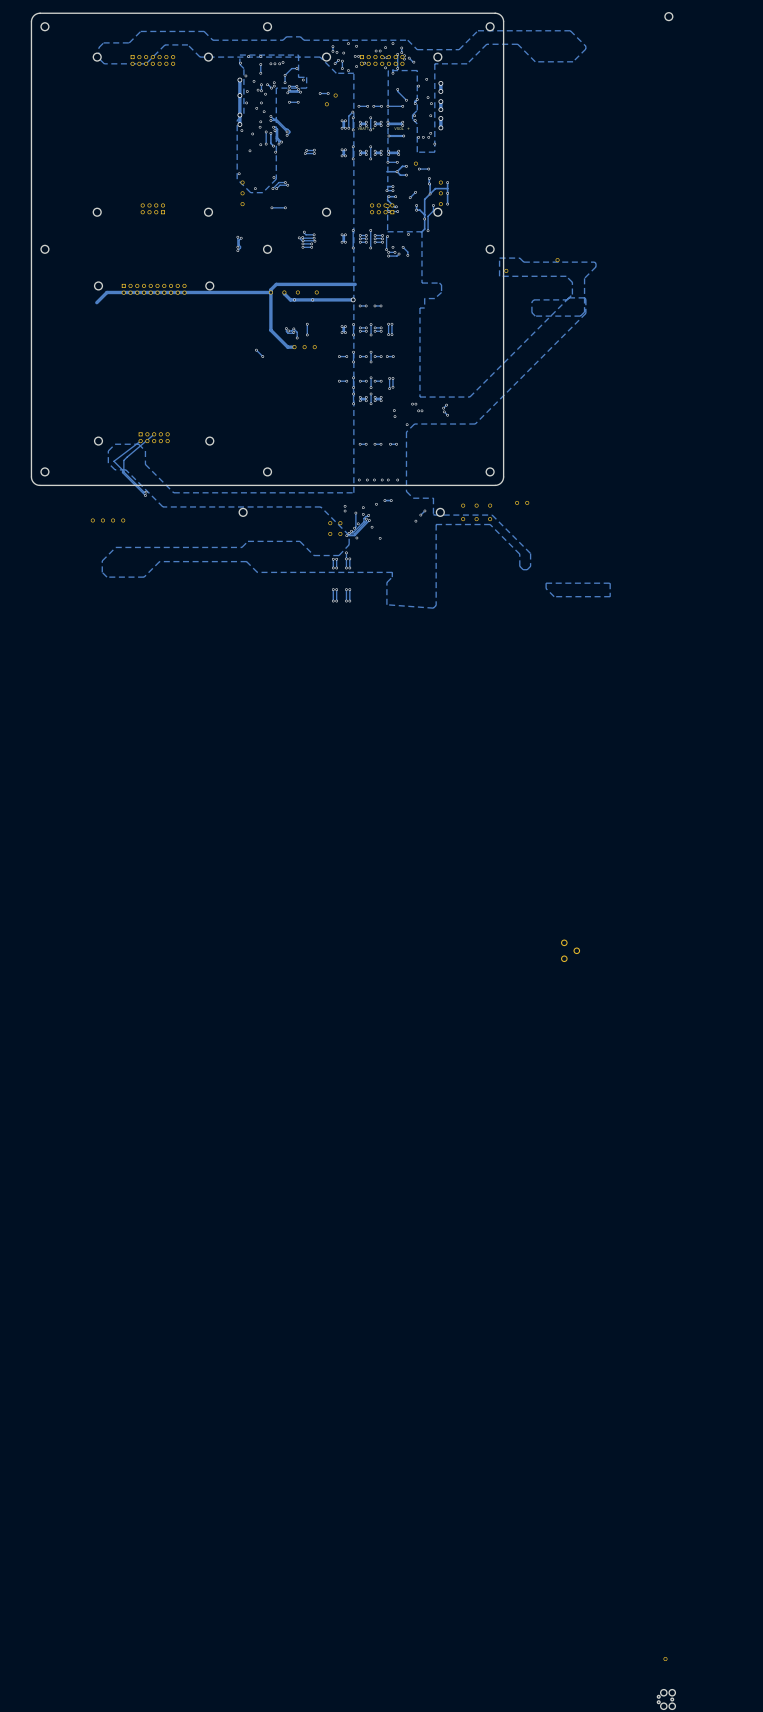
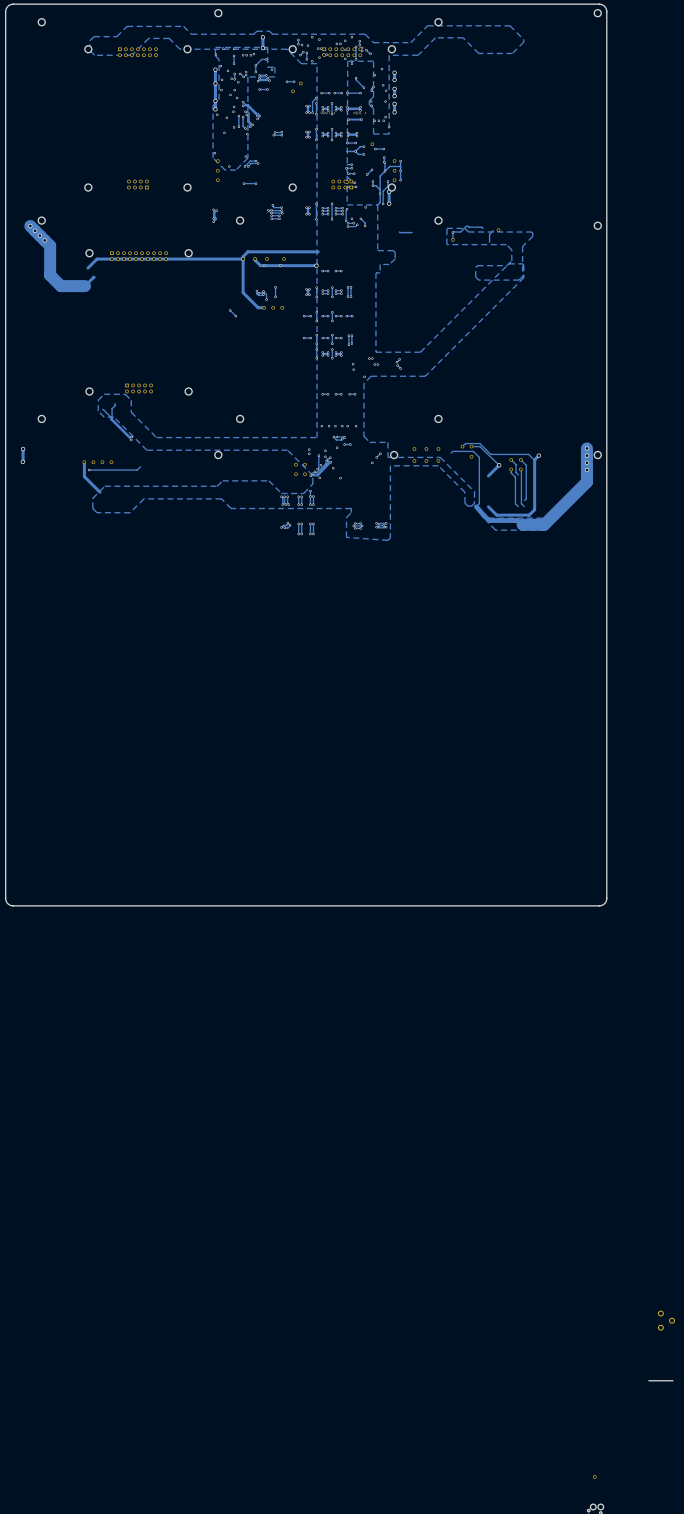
board edge: none -> (599, 4) (13, 4) (6, 8) (5, 898) (9, 904) (599, 905) (605, 902) (606, 11) (604, 6) (599, 4)
board edge: (495, 13) (40, 13) (33, 15) (31, 21) (31, 476) (33, 482) (39, 485) (495, 485) (501, 482) (503, 476) (503, 21) (501, 15) (495, 13) -> none
hole position: (267, 26) -> (218, 13)
track: none -> (262, 37) (262, 48)
via: none -> (262, 37)
via: none -> (262, 48)
track: none -> (389, 191) (389, 203)
via: none -> (389, 191)
via: none -> (389, 203)
track: none -> (30, 225) (50, 245) (50, 275) (60, 286) (85, 286) (93, 277)
via: none -> (30, 225)
hole: none -> (597, 225)
track: none -> (482, 228) (466, 226) (460, 232) (452, 232) (452, 239)
via: none -> (35, 230)
track: none -> (493, 230) (489, 234) (489, 242)
track: none -> (399, 232) (412, 232)
via: none -> (452, 232)
via: none -> (39, 235)
via: none -> (44, 240)
track: (154, 434) (127, 457) -> (115, 403) (115, 405)
track: (140, 441) (113, 461) -> (102, 409) (103, 409)
track: none -> (333, 436) (336, 439) (342, 439)
via: none -> (333, 436)
track: none -> (336, 436) (344, 437)
via: none -> (336, 436)
via: none -> (344, 437)
via: none -> (342, 439)
track: none -> (462, 446) (465, 443) (479, 443) (490, 454) (528, 454) (534, 459)
track: none -> (471, 446) (479, 446) (499, 465) (488, 476)
track: none -> (586, 448) (586, 482) (544, 524) (521, 524) (517, 520) (488, 520) (476, 506)
via: none -> (586, 448)
track: none -> (23, 449) (22, 461)
via: none -> (23, 449)
track: none -> (451, 453) (452, 451) (473, 451) (479, 457) (479, 503) (476, 506)
hole: none -> (597, 455)
track: none -> (538, 455) (534, 459)
via: none -> (538, 455)
via: none -> (586, 455)
part: none -> (471, 456)
track: none -> (511, 459) (516, 464) (516, 472) (518, 474)
part: none -> (511, 459)
track: none -> (520, 459) (526, 465) (526, 498) (524, 500)
part: none -> (520, 459)
track: none -> (534, 459) (534, 509) (529, 515) (496, 515) (488, 506)
via: none -> (22, 461)
track: none -> (84, 462) (84, 476) (100, 492)
via: none -> (586, 462)
via: none -> (499, 465)
track: none -> (140, 466) (137, 470) (89, 470)
track: none -> (511, 469) (511, 473) (515, 477) (515, 503) (518, 506)
part: none -> (511, 469)
track: none -> (520, 469) (521, 503) (524, 506)
part: none -> (520, 469)
via: none -> (89, 470)
via: none -> (586, 470)
track: none -> (281, 496) (282, 504)
via: none -> (281, 496)
track: none -> (284, 496) (285, 504)
via: none -> (284, 496)
track: none -> (287, 496) (288, 504)
via: none -> (287, 496)
via: none -> (282, 504)
via: none -> (285, 504)
via: none -> (288, 504)
track: none -> (287, 522) (281, 527)
via: none -> (287, 522)
via: none -> (355, 523)
track: none -> (360, 523) (355, 523)
via: none -> (360, 523)
via: none -> (376, 523)
track: none -> (386, 523) (376, 523)
via: none -> (386, 523)
track: none -> (289, 525) (287, 528) (284, 527)
via: none -> (289, 525)
via: none -> (353, 525)
track: none -> (362, 525) (353, 525)
via: none -> (362, 525)
via: none -> (378, 525)
track: none -> (383, 525) (378, 525)
via: none -> (383, 525)
via: none -> (281, 527)
via: none -> (284, 527)
via: none -> (376, 527)
track: none -> (386, 527) (376, 527)
via: none -> (386, 527)
via: none -> (355, 528)
track: none -> (360, 528) (355, 528)
via: none -> (360, 528)
part: (570, 950) -> none
part: none -> (666, 1320)
part: none -> (660, 1380)

